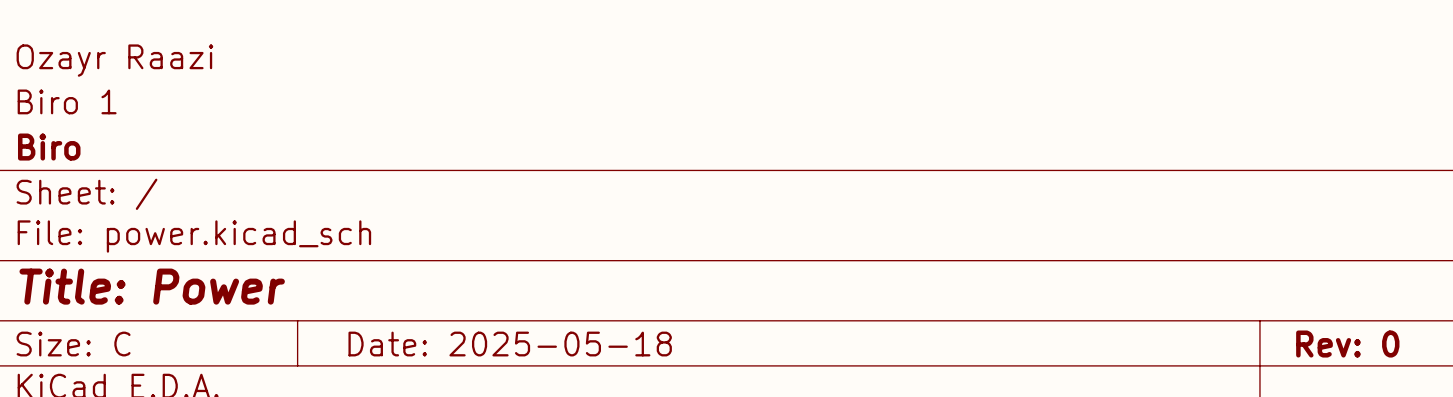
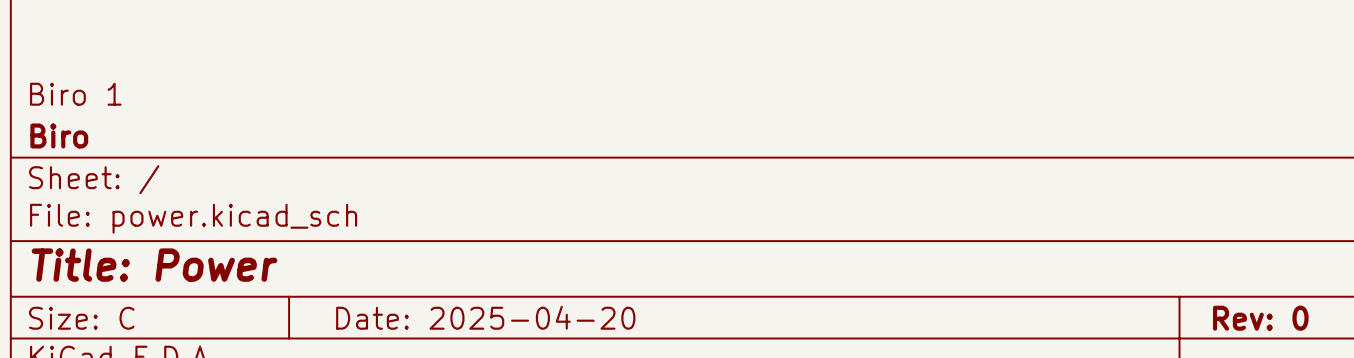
title block: Ozayr Raazi (114, 60) -> none
title block: Date: 2025-05-18 (510, 344) -> Date: 2025-04-20 (485, 317)

